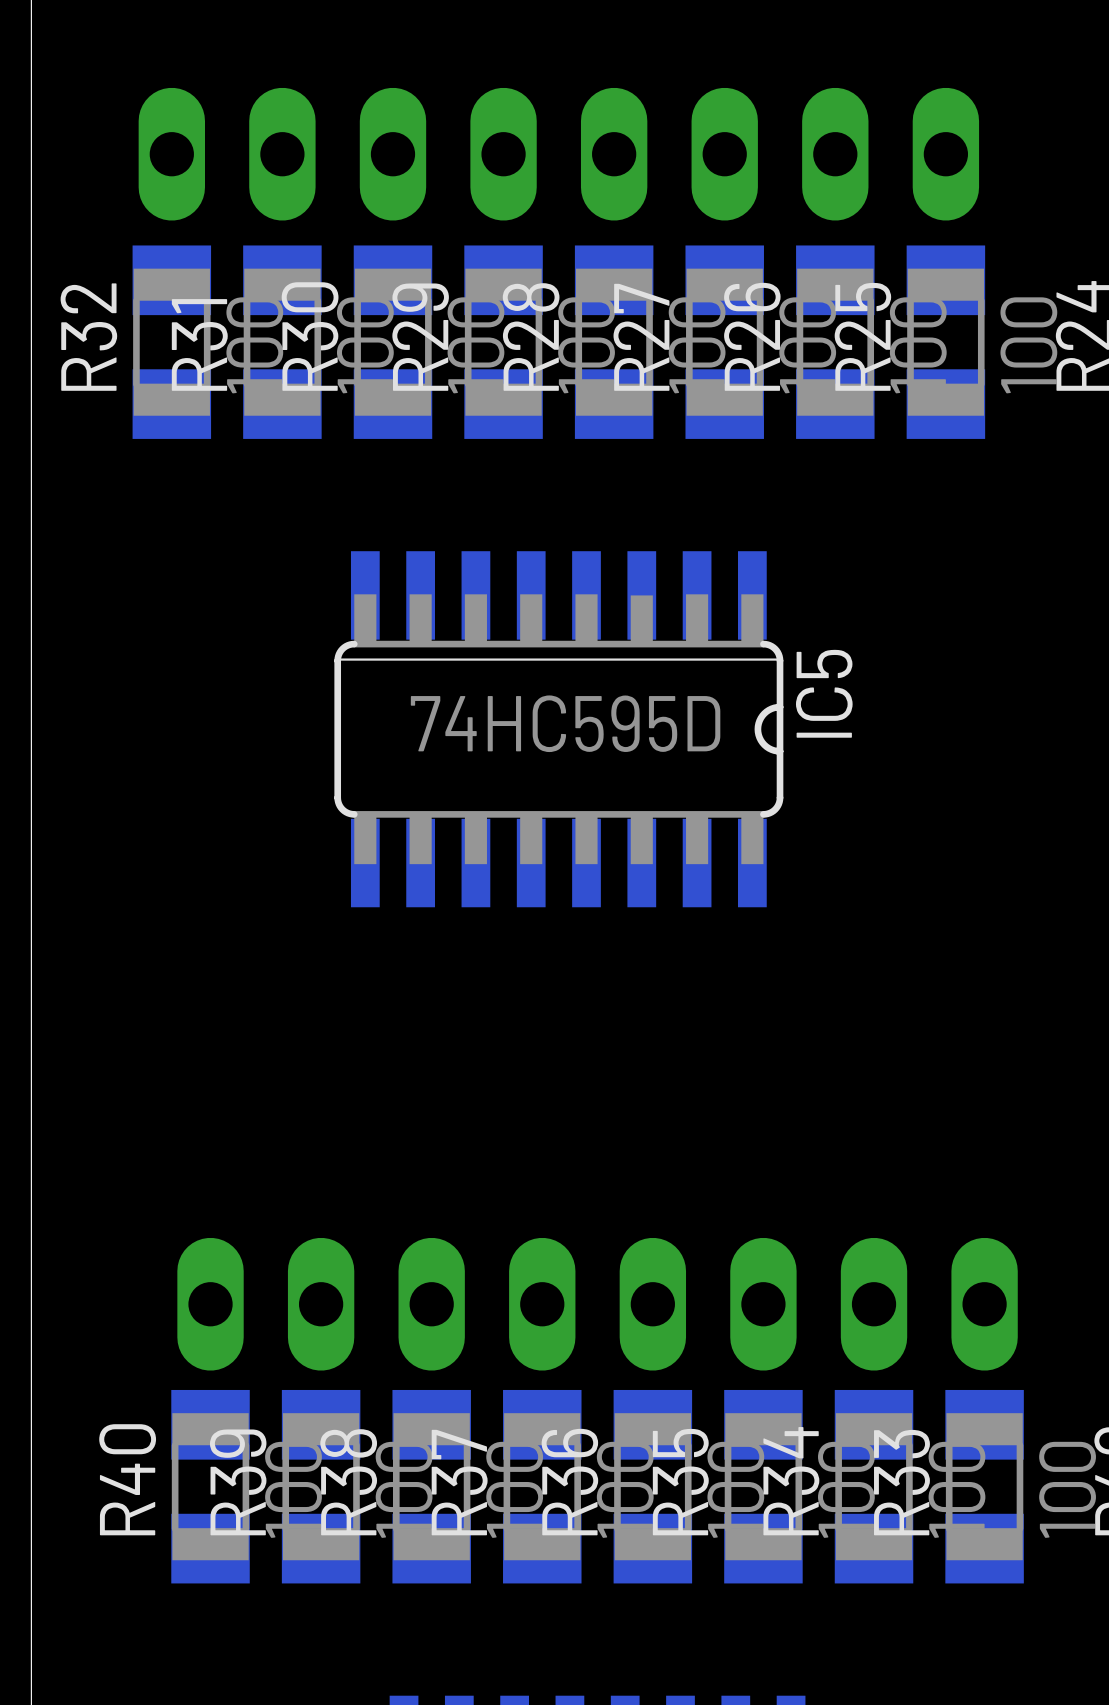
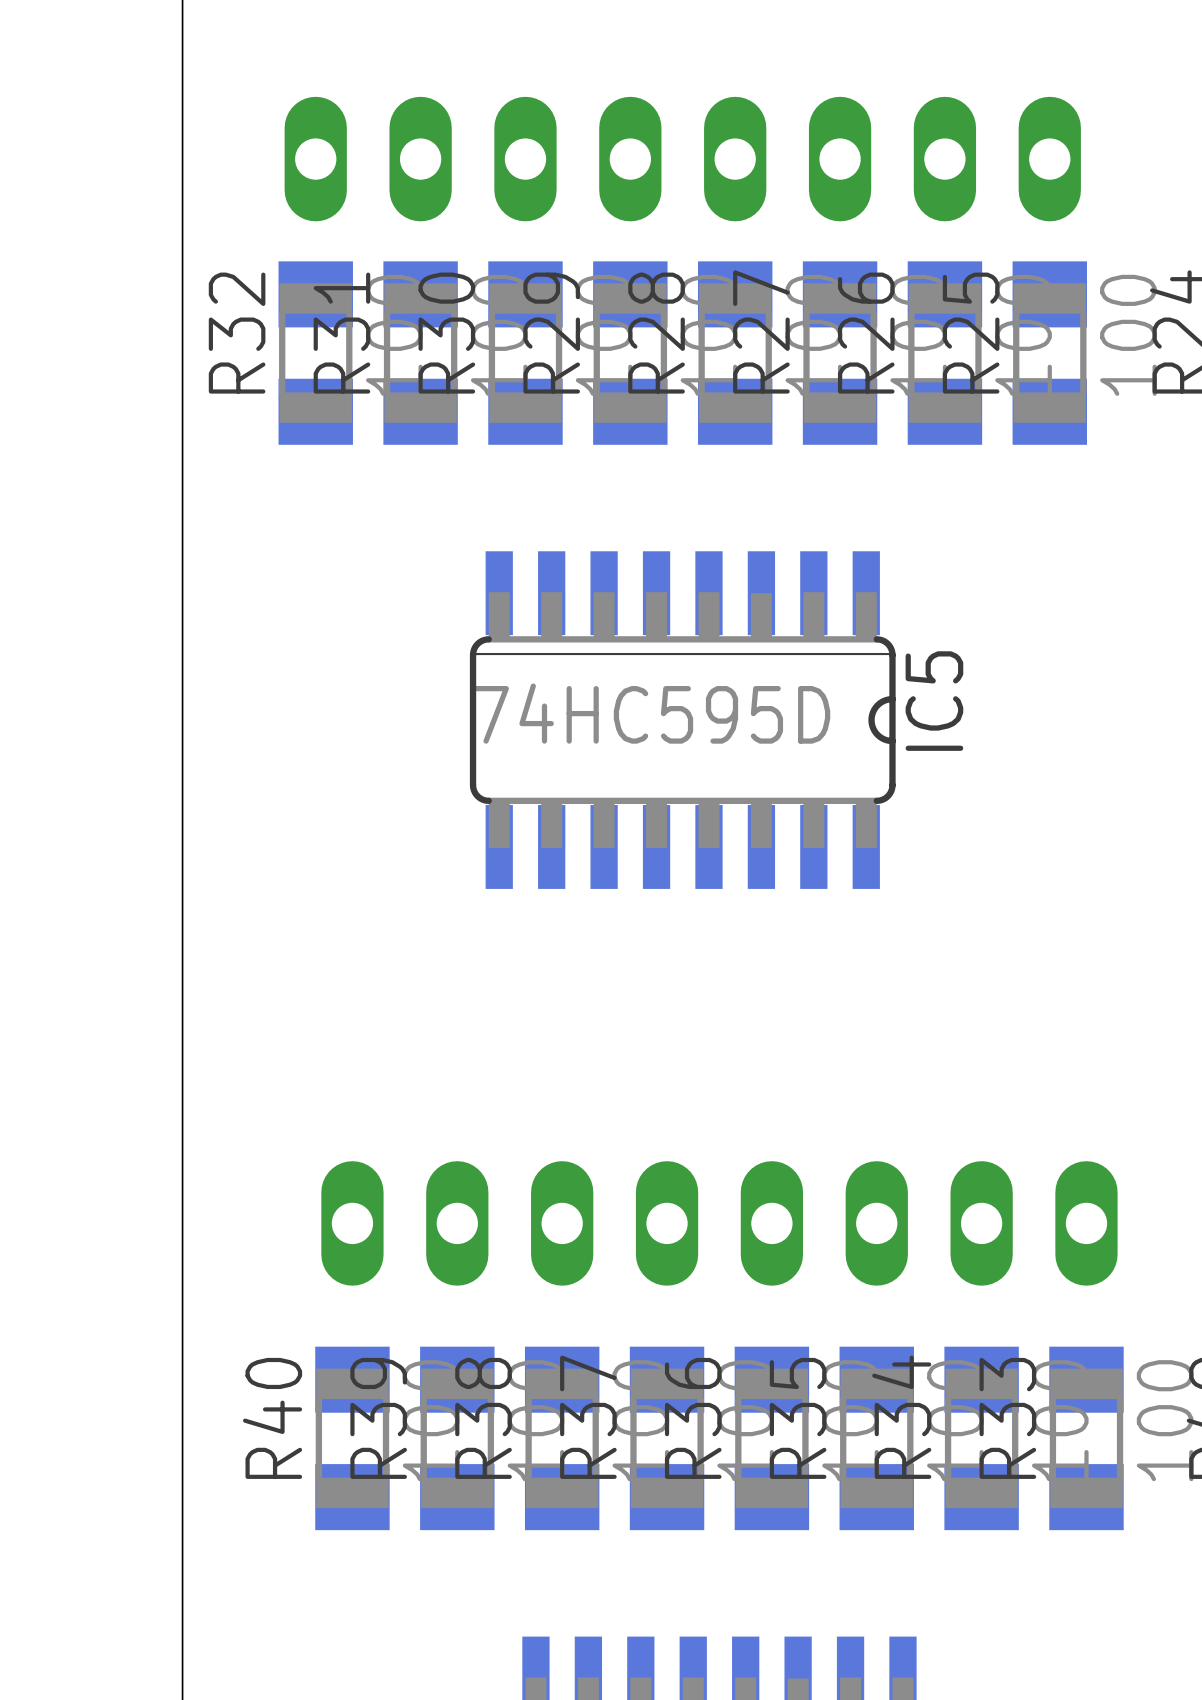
part footprint: [138, 87, 980, 221] -> [284, 96, 1081, 222]
part: none -> (719, 1223)
part: (597, 1304) -> none

